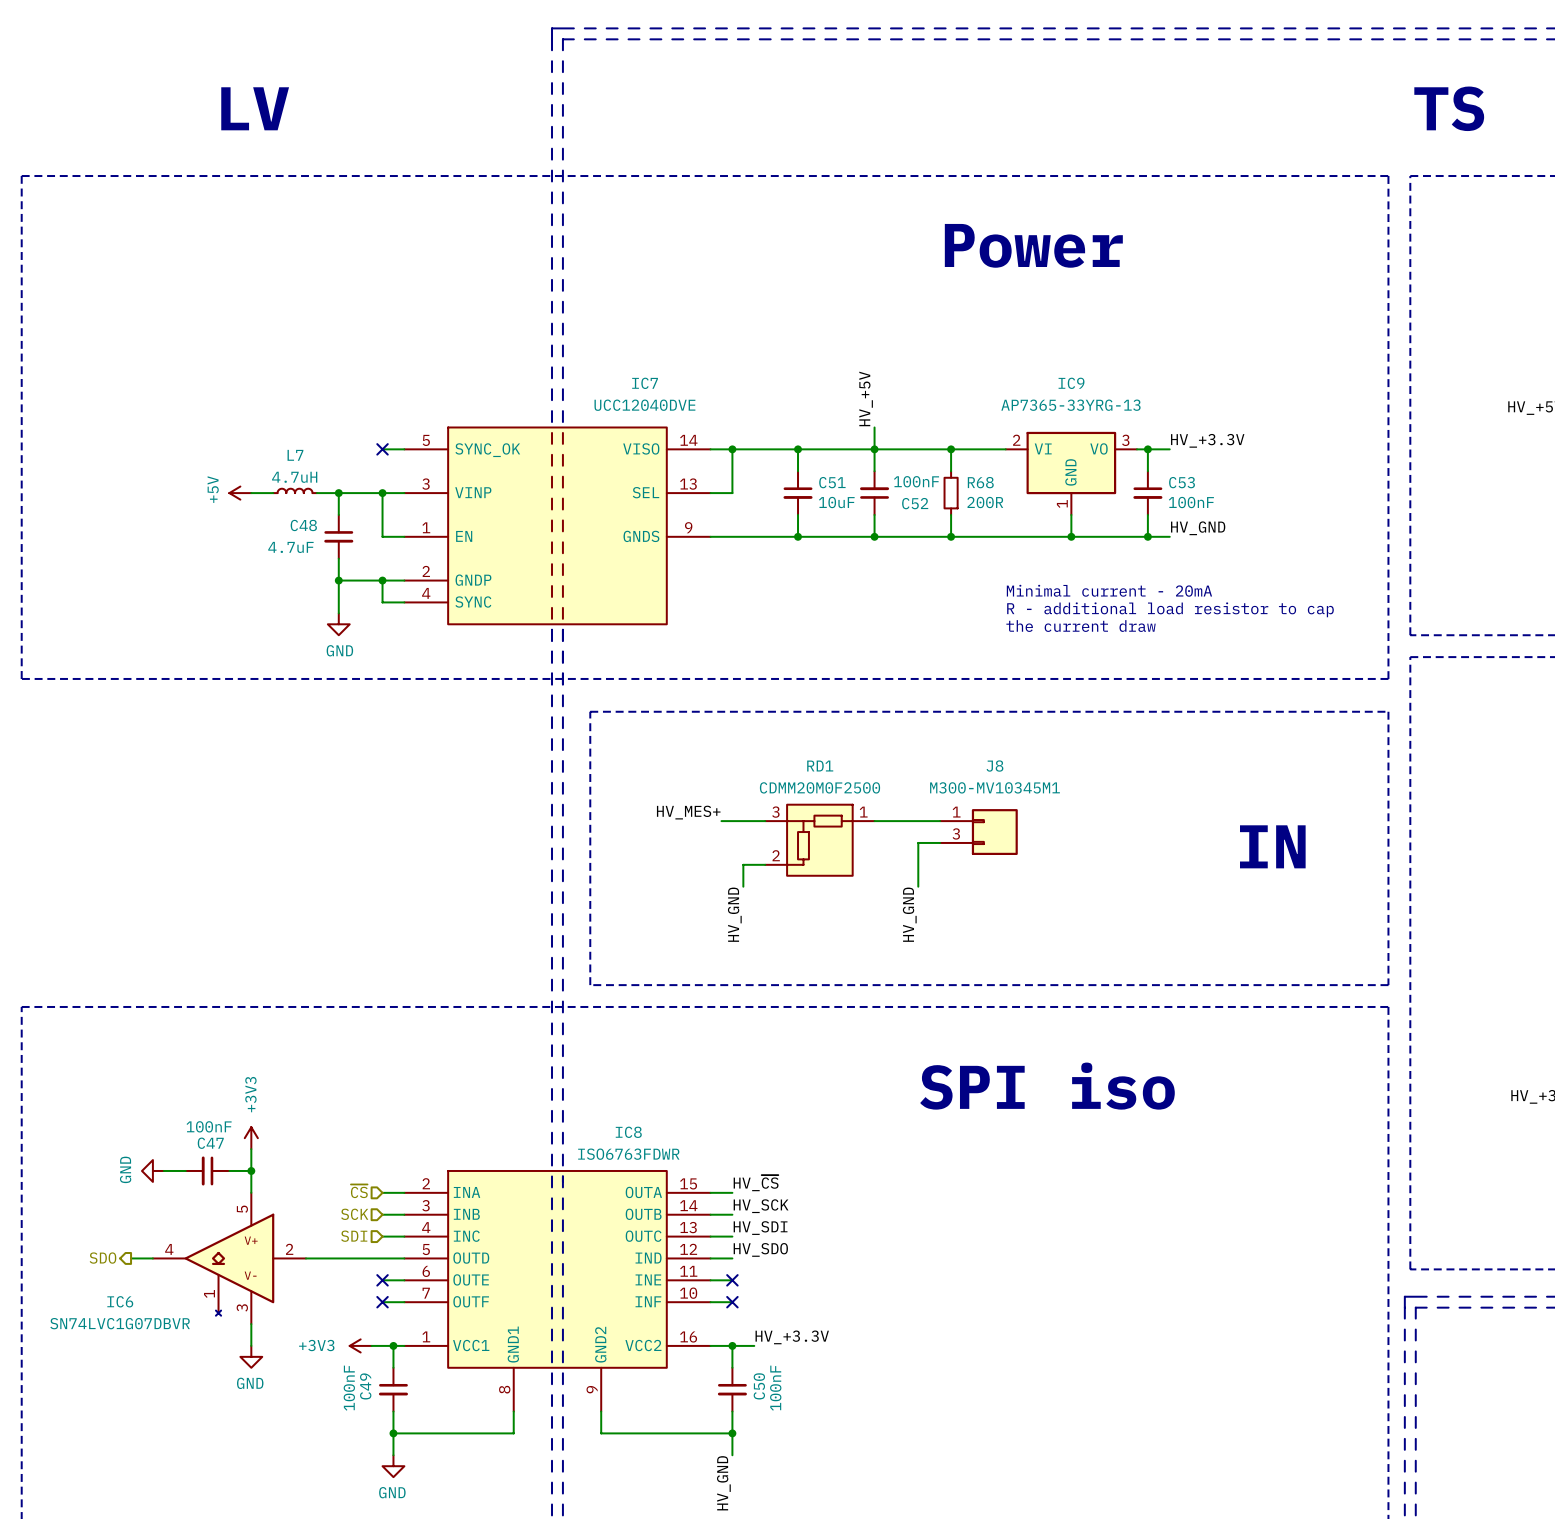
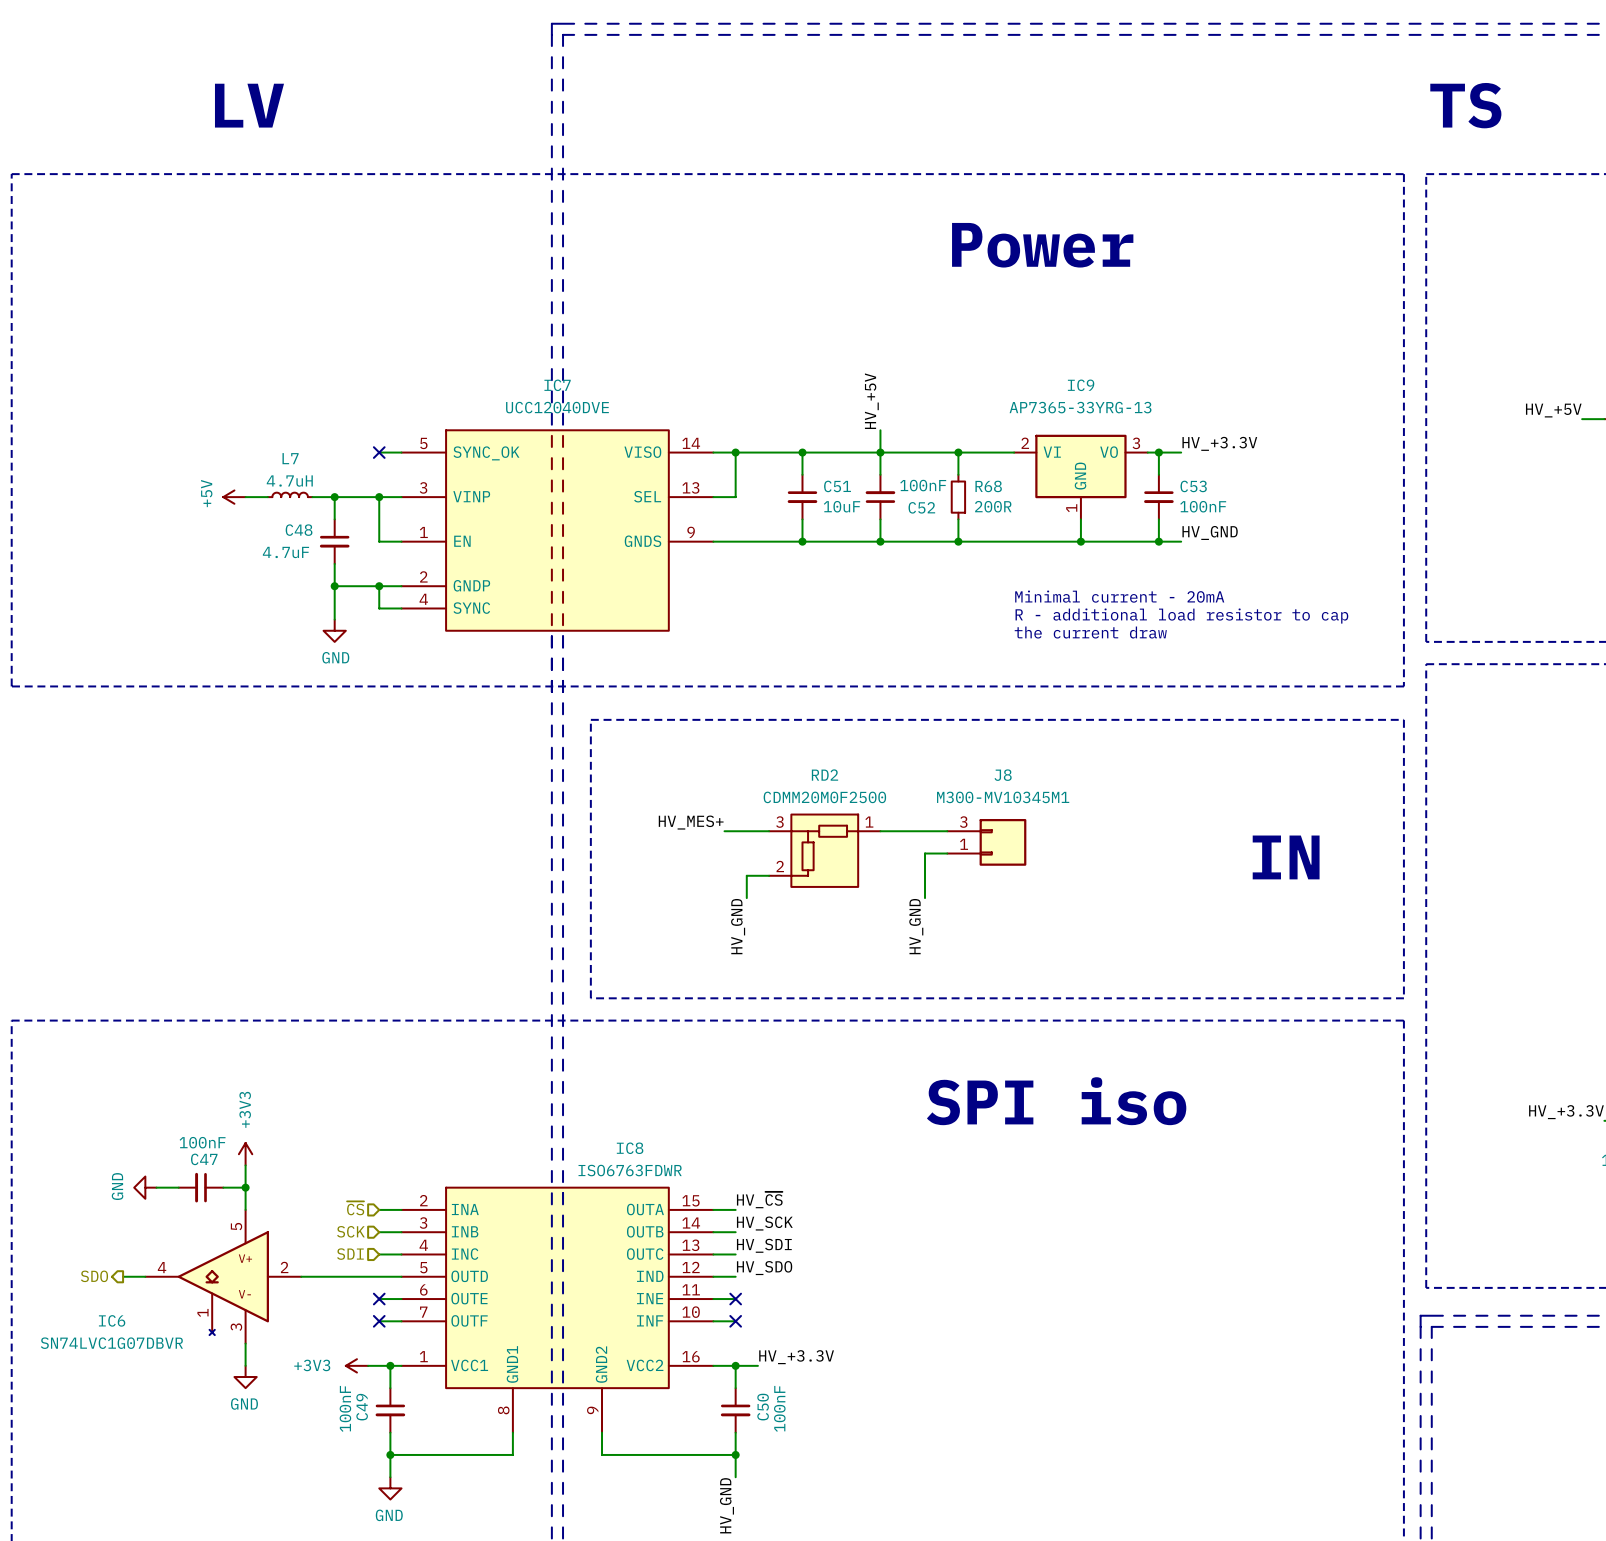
IC7 name position: IC7 (645, 383) -> IC7 (557, 385)
IC7 value position: UCC12040DVE (644, 405) -> UCC12040DVE (557, 407)
RD1 name: RD1 (820, 766) -> RD2 (824, 775)
J8 flip: as is (994, 832) -> up-down (1002, 842)

